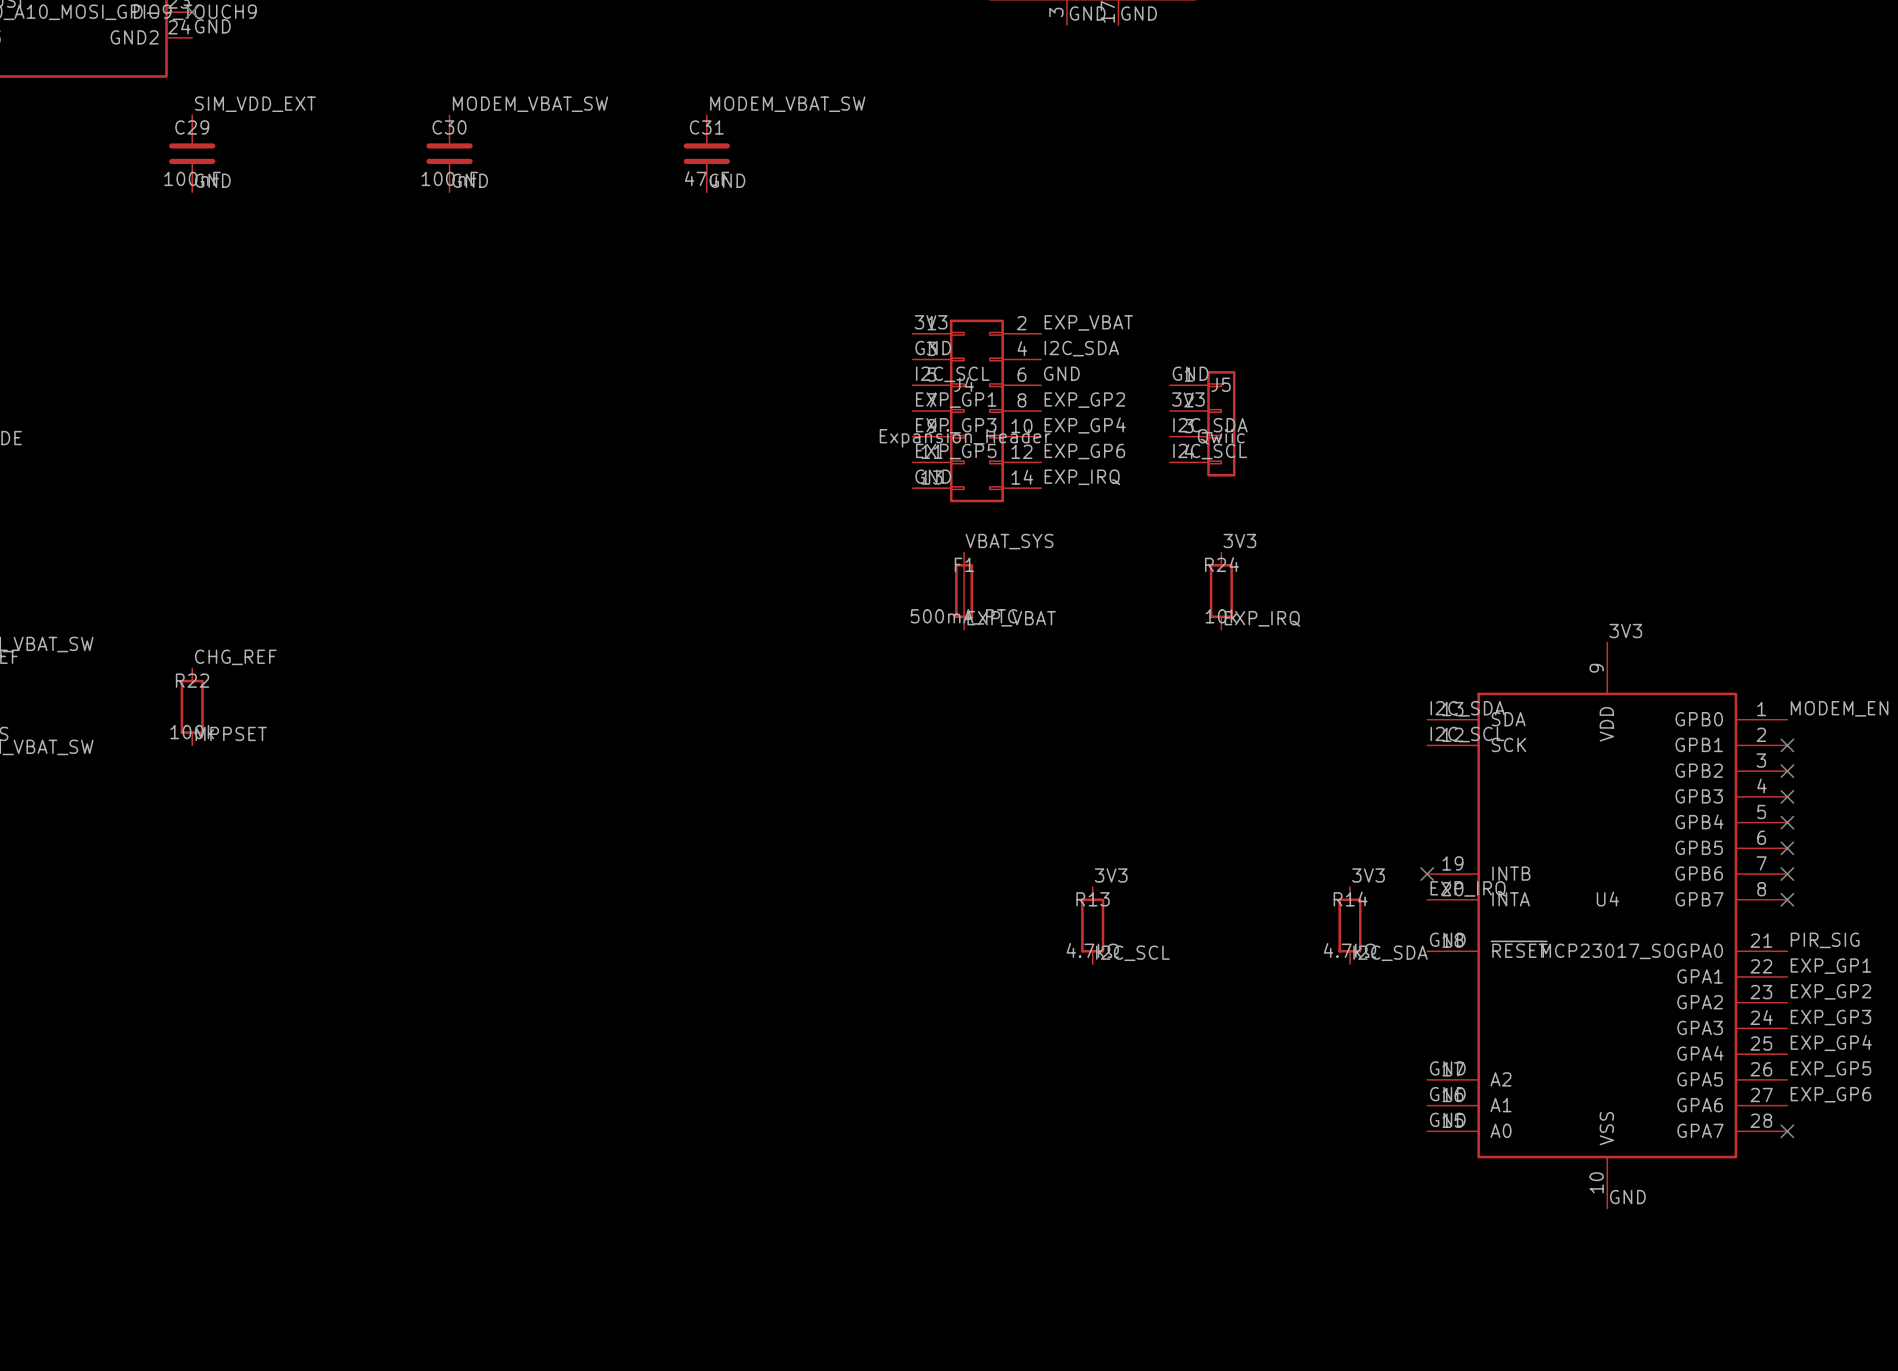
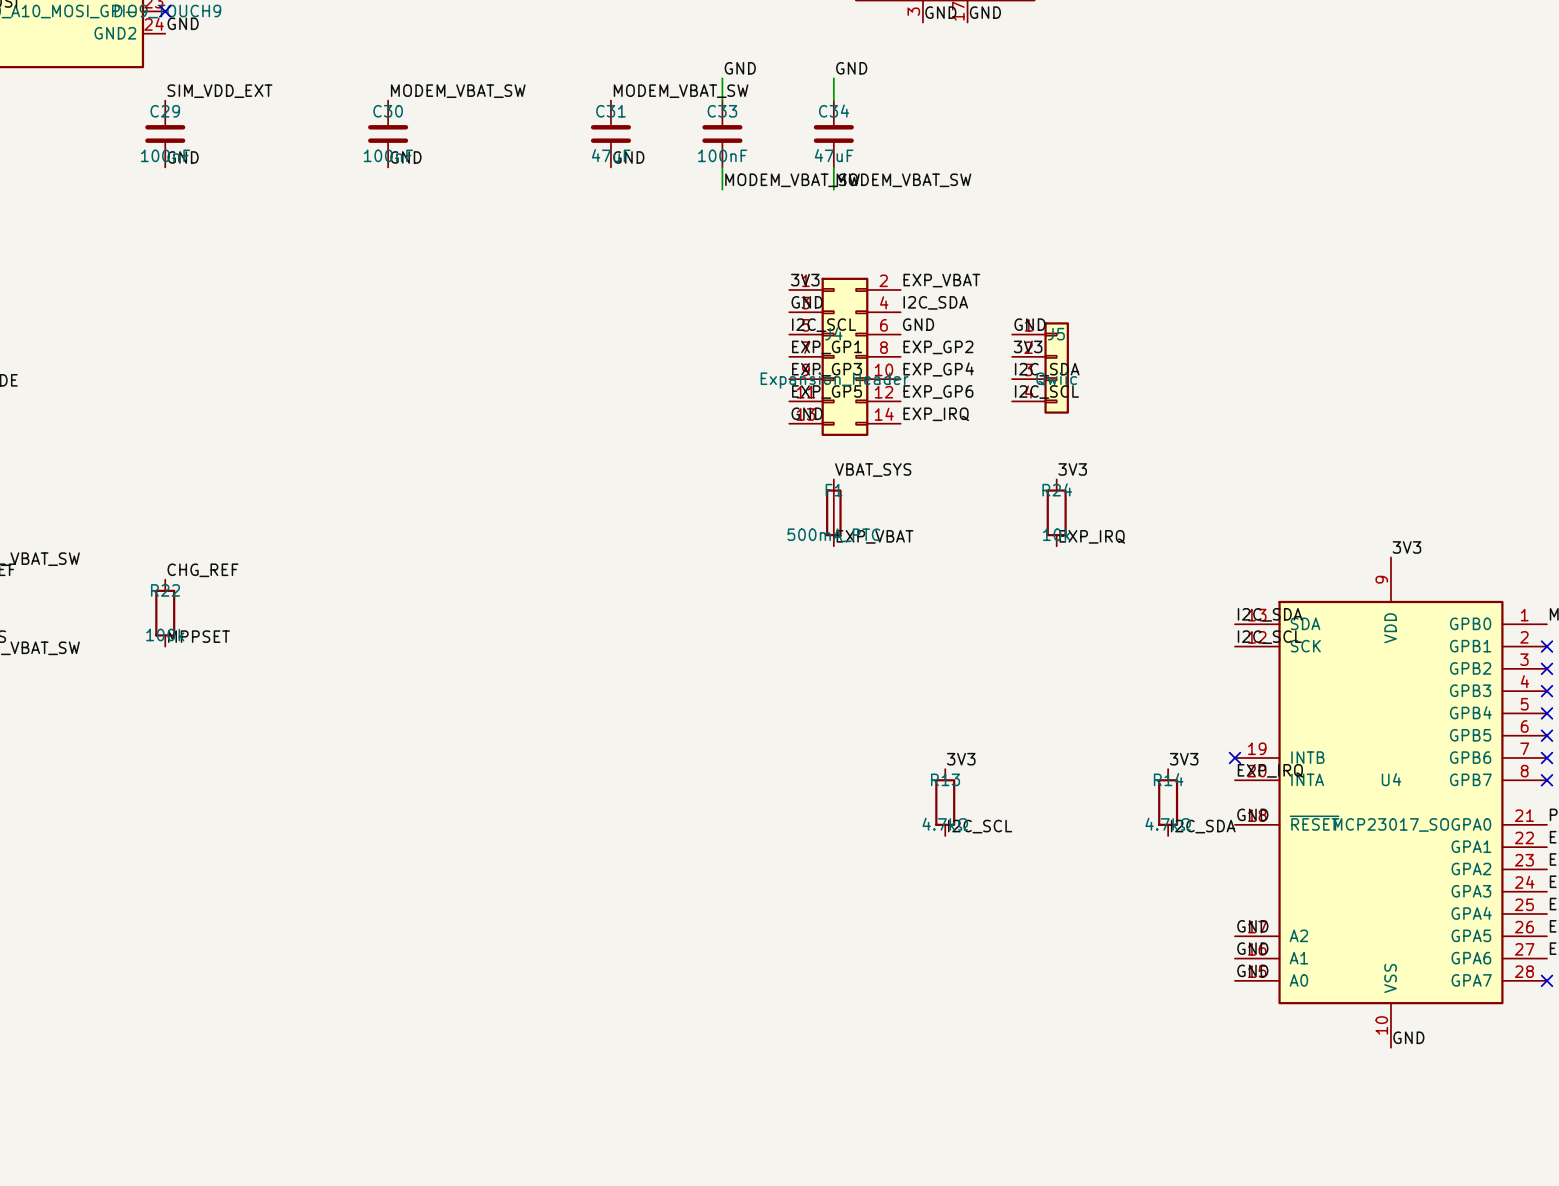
label: none -> GND (740, 68)
label: none -> GND (851, 68)
wire: none -> (722, 78) (722, 100)
wire: none -> (833, 78) (833, 100)
C33: none -> 100nF (722, 133)
C34: none -> 47uF (833, 133)
wire: none -> (722, 167) (722, 189)
wire: none -> (833, 167) (833, 189)
label: none -> MODEM_VBAT_SW (792, 180)
label: none -> MODEM_VBAT_SW (903, 180)

